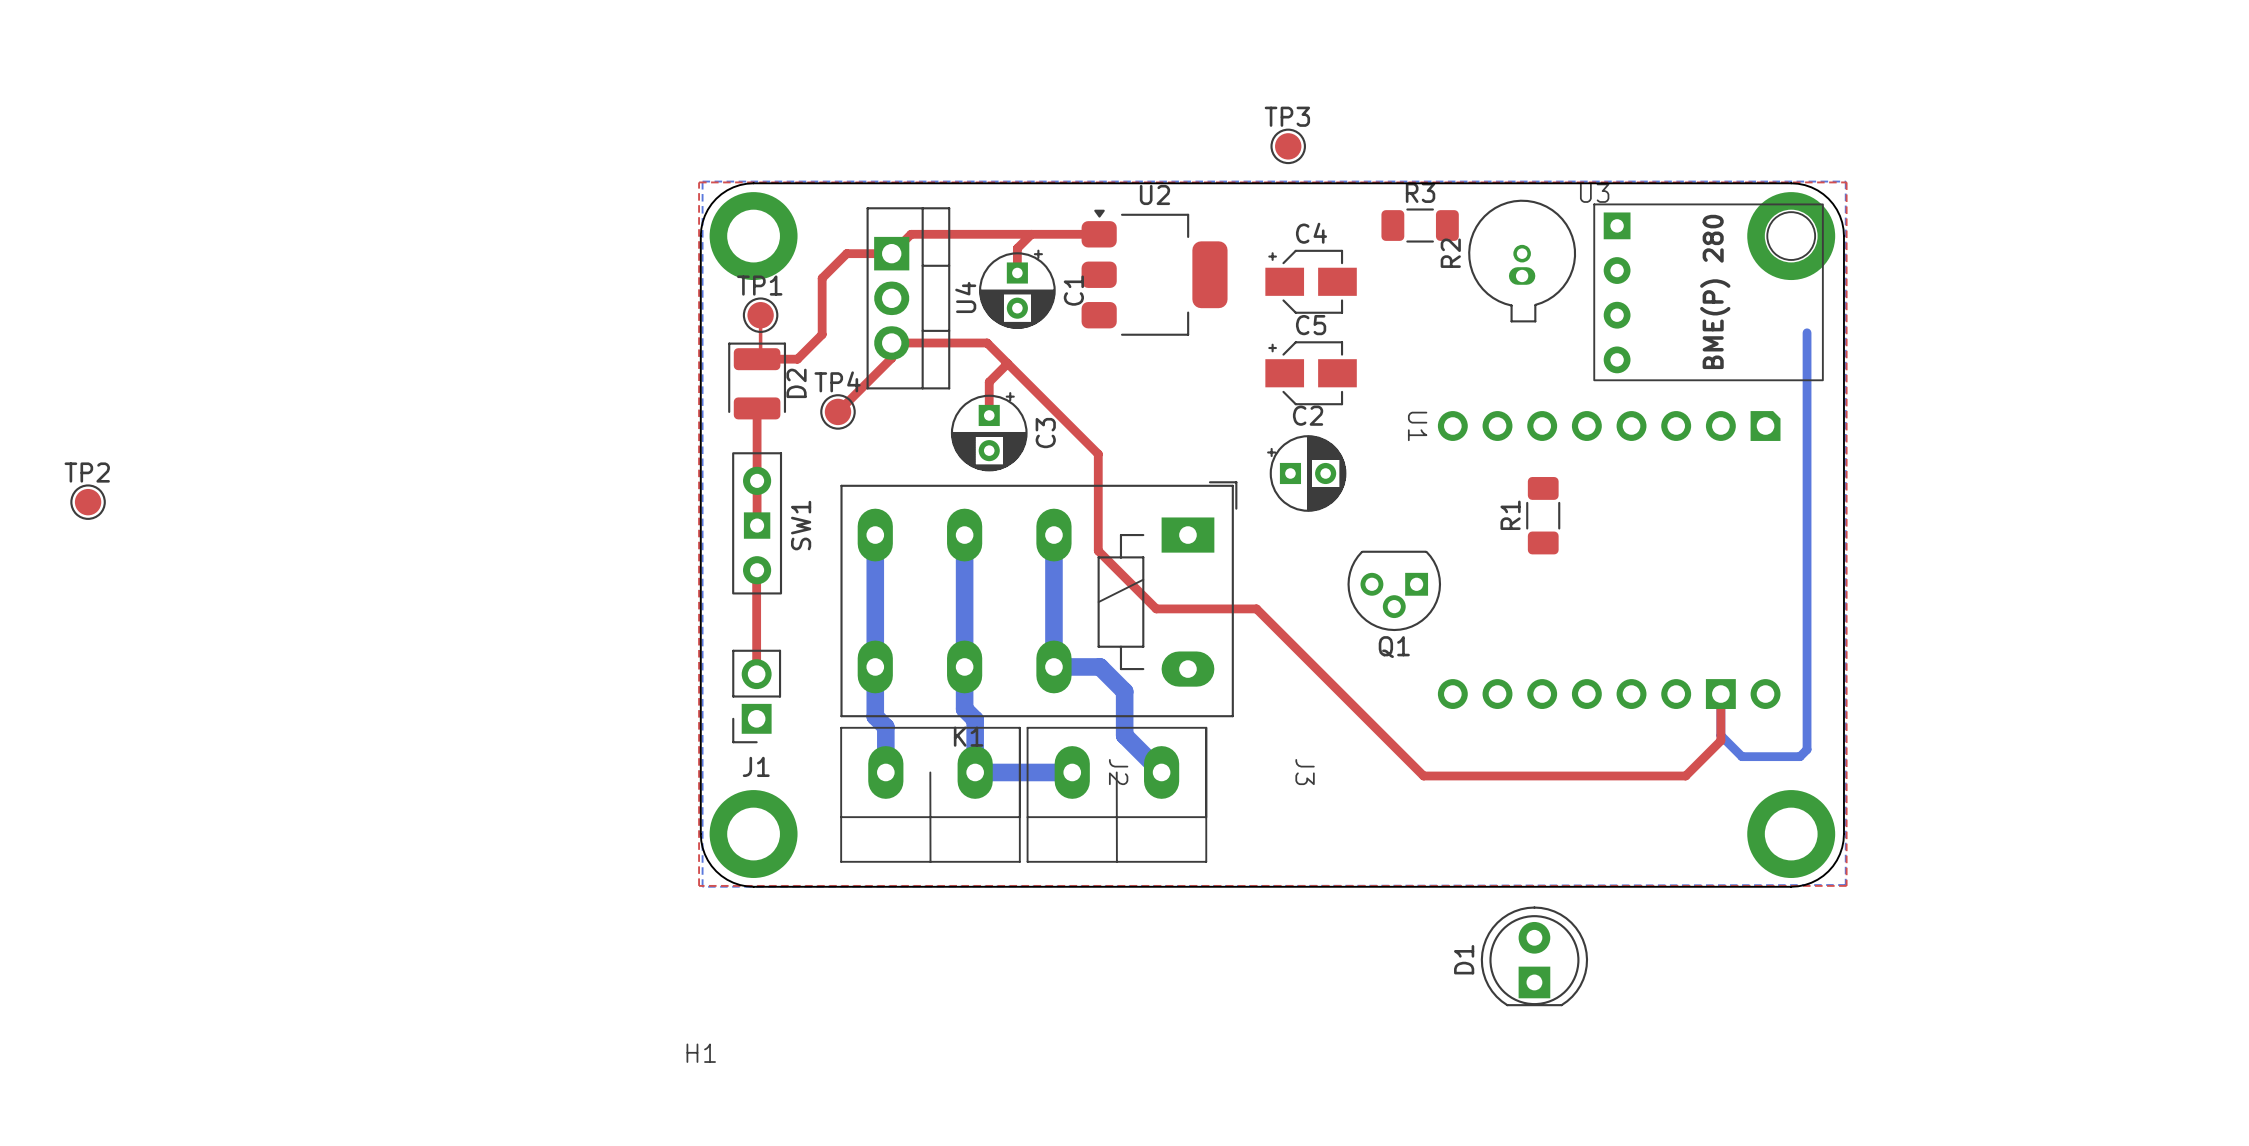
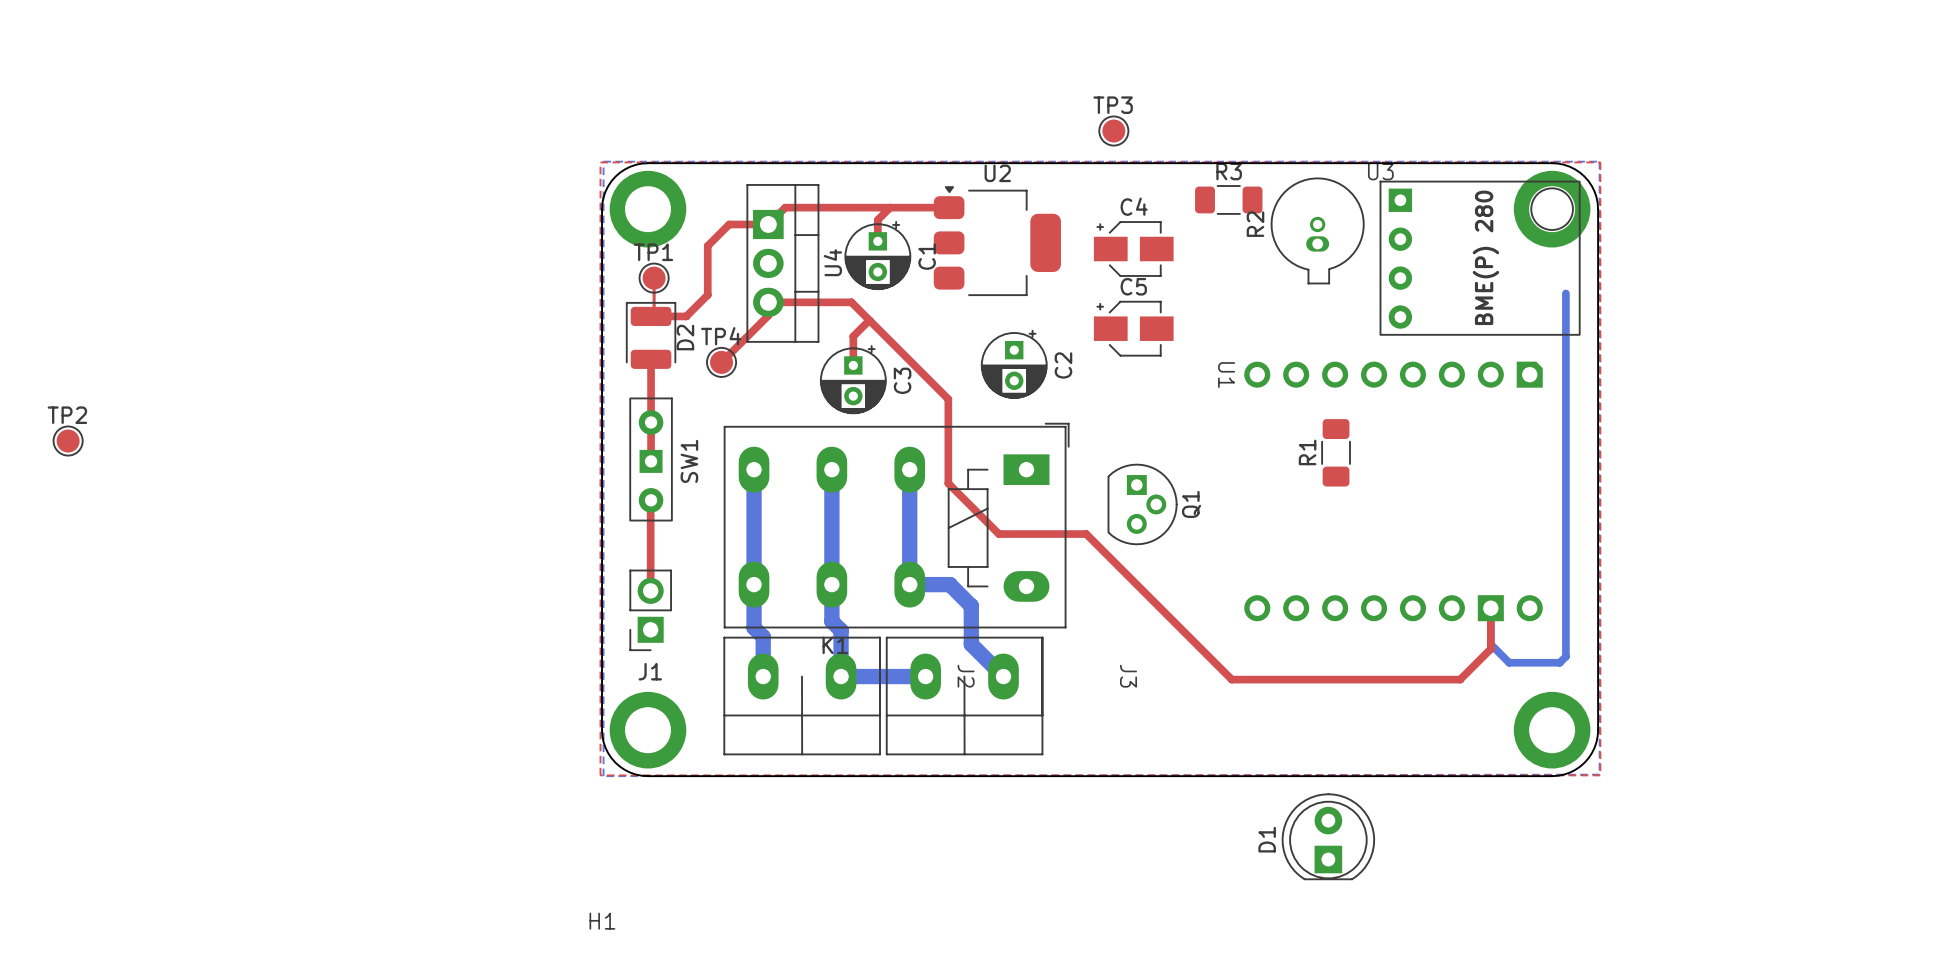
C2 rotation: 0° (1306, 473) -> 90° clockwise (1014, 364)
C2 position: (1306, 473) -> (1014, 364)
Q1 rotation: 0° (1394, 590) -> 90° counterclockwise (1142, 504)
Q1 position: (1394, 590) -> (1142, 504)

